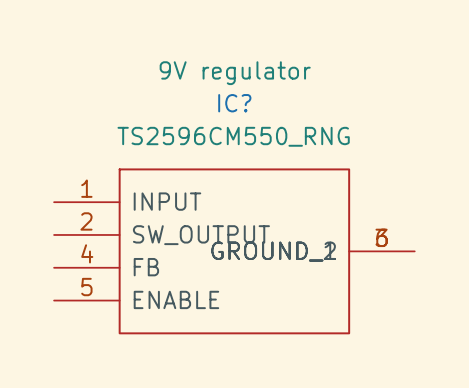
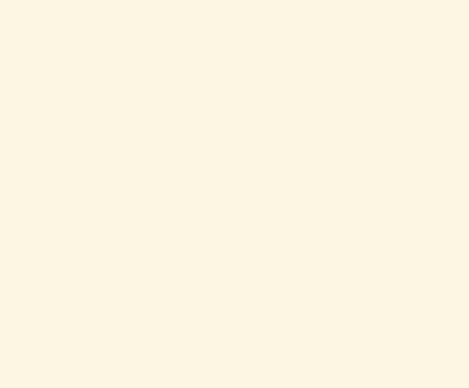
IC?: TS2596CM550_RNG (234, 251) -> none

